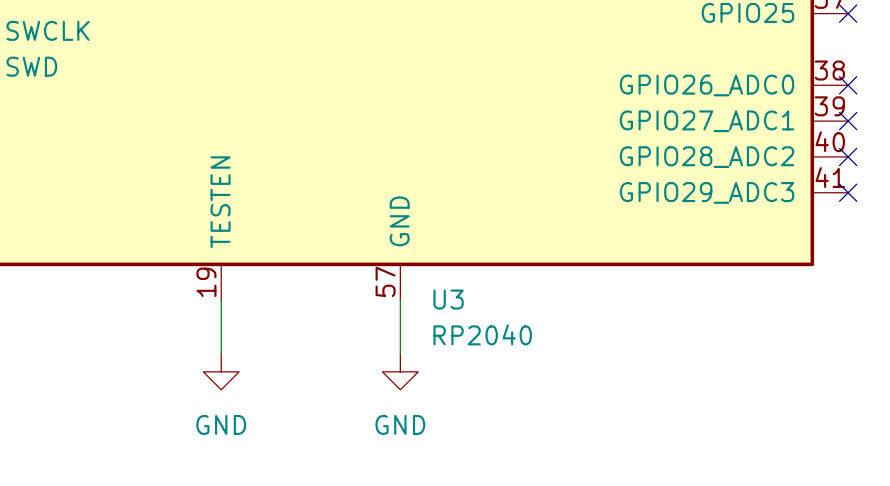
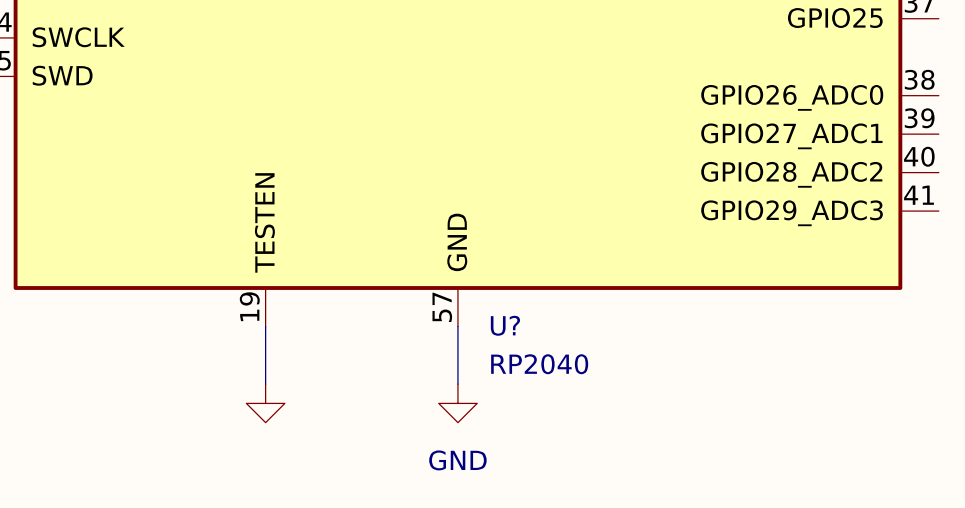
no-connect mark: (848, 13) -> none
no-connect mark: (848, 85) -> none
no-connect mark: (848, 121) -> none
no-connect mark: (848, 156) -> none
no-connect mark: (848, 192) -> none
U3 name: U3 (448, 299) -> U? (505, 325)
power symbol text: GND (221, 424) -> none

